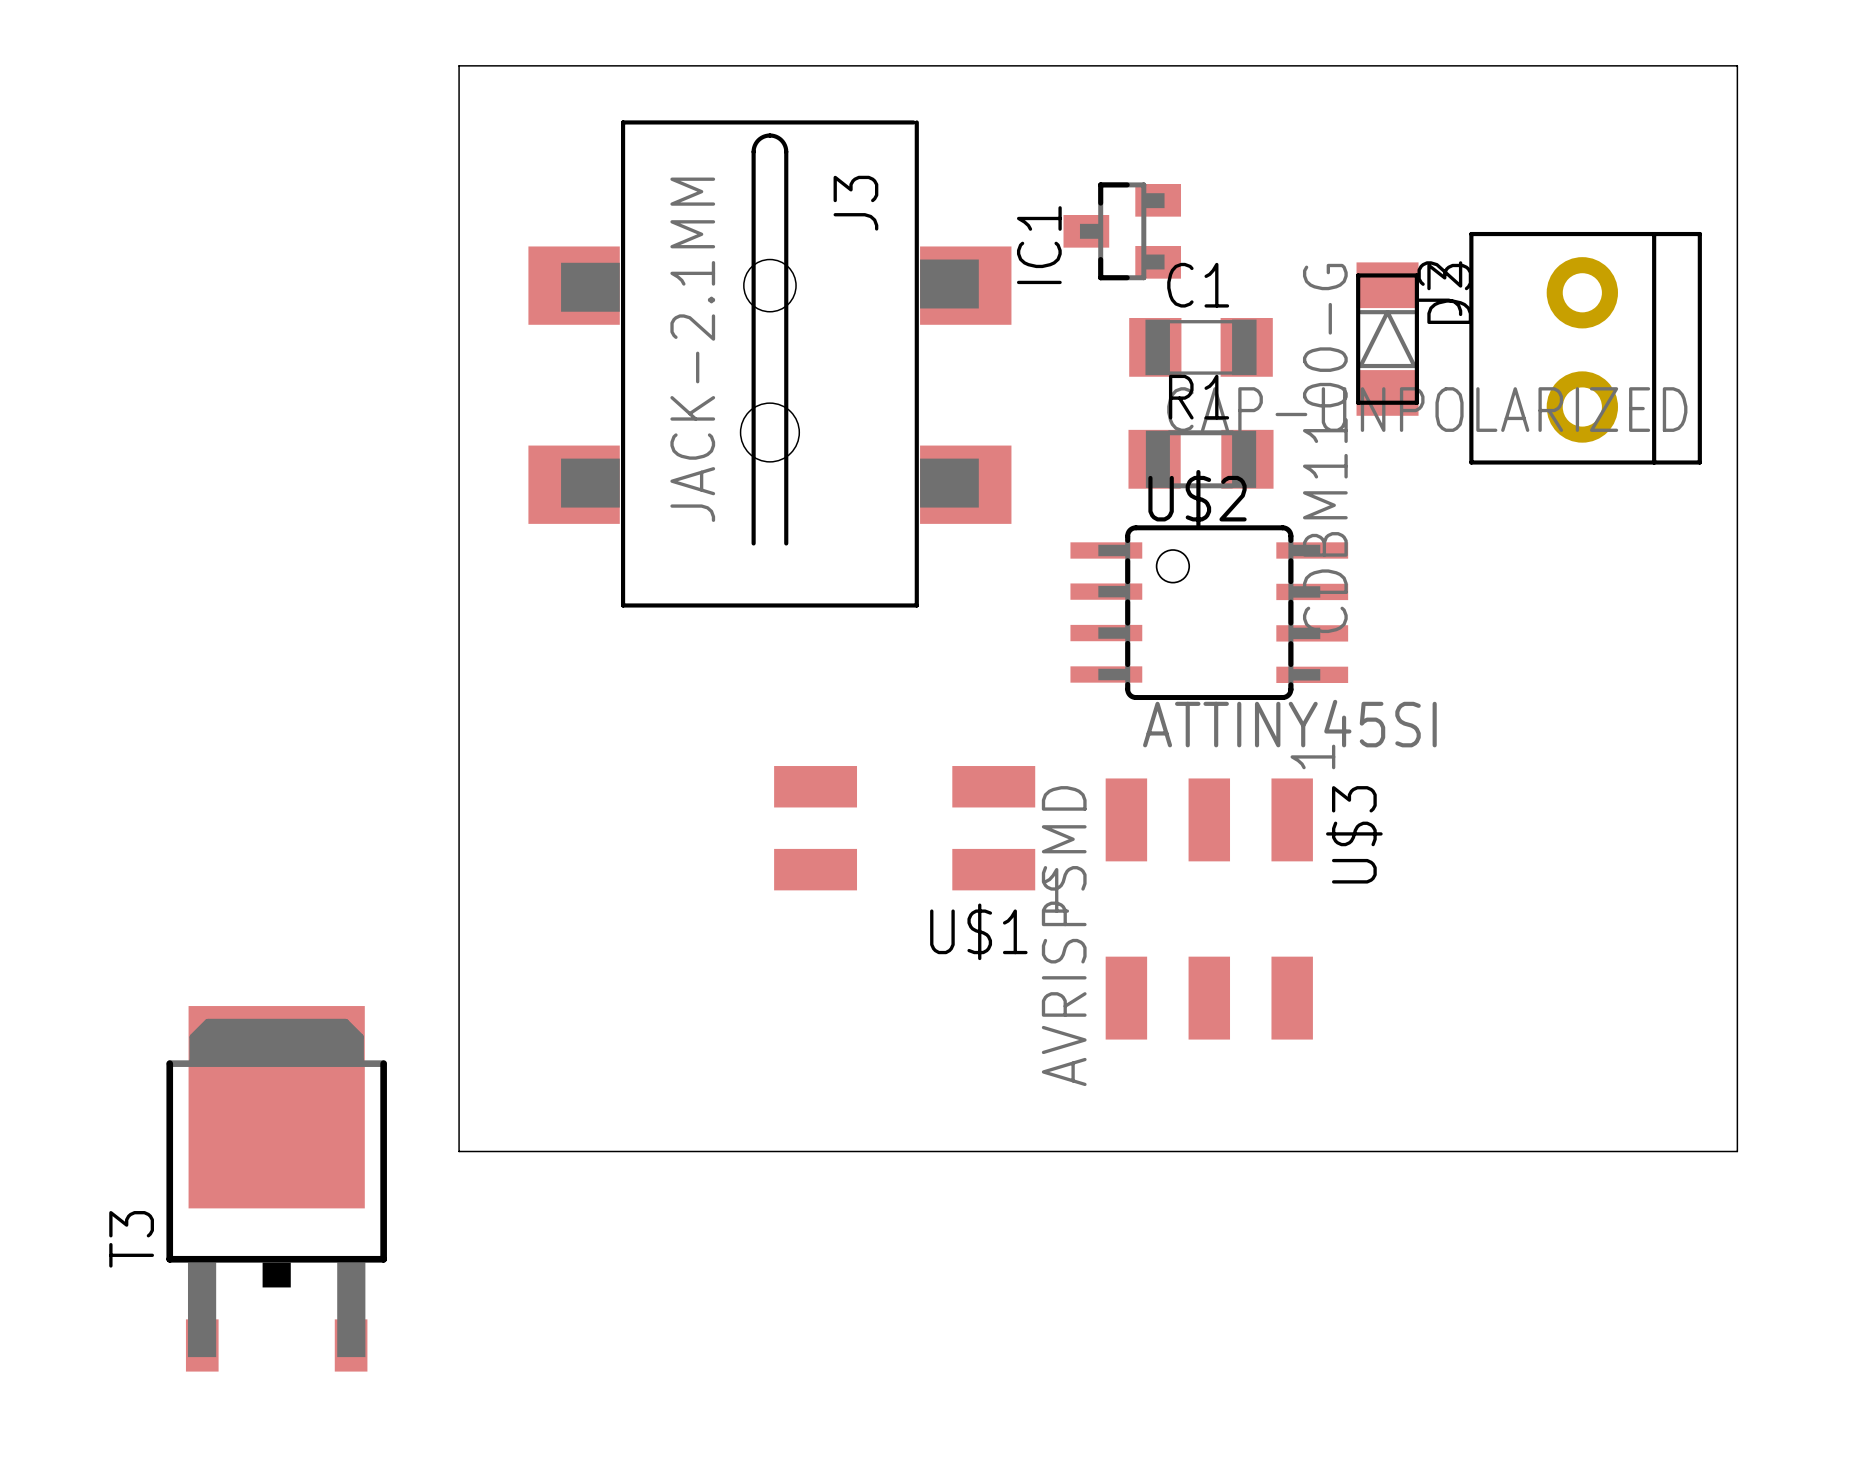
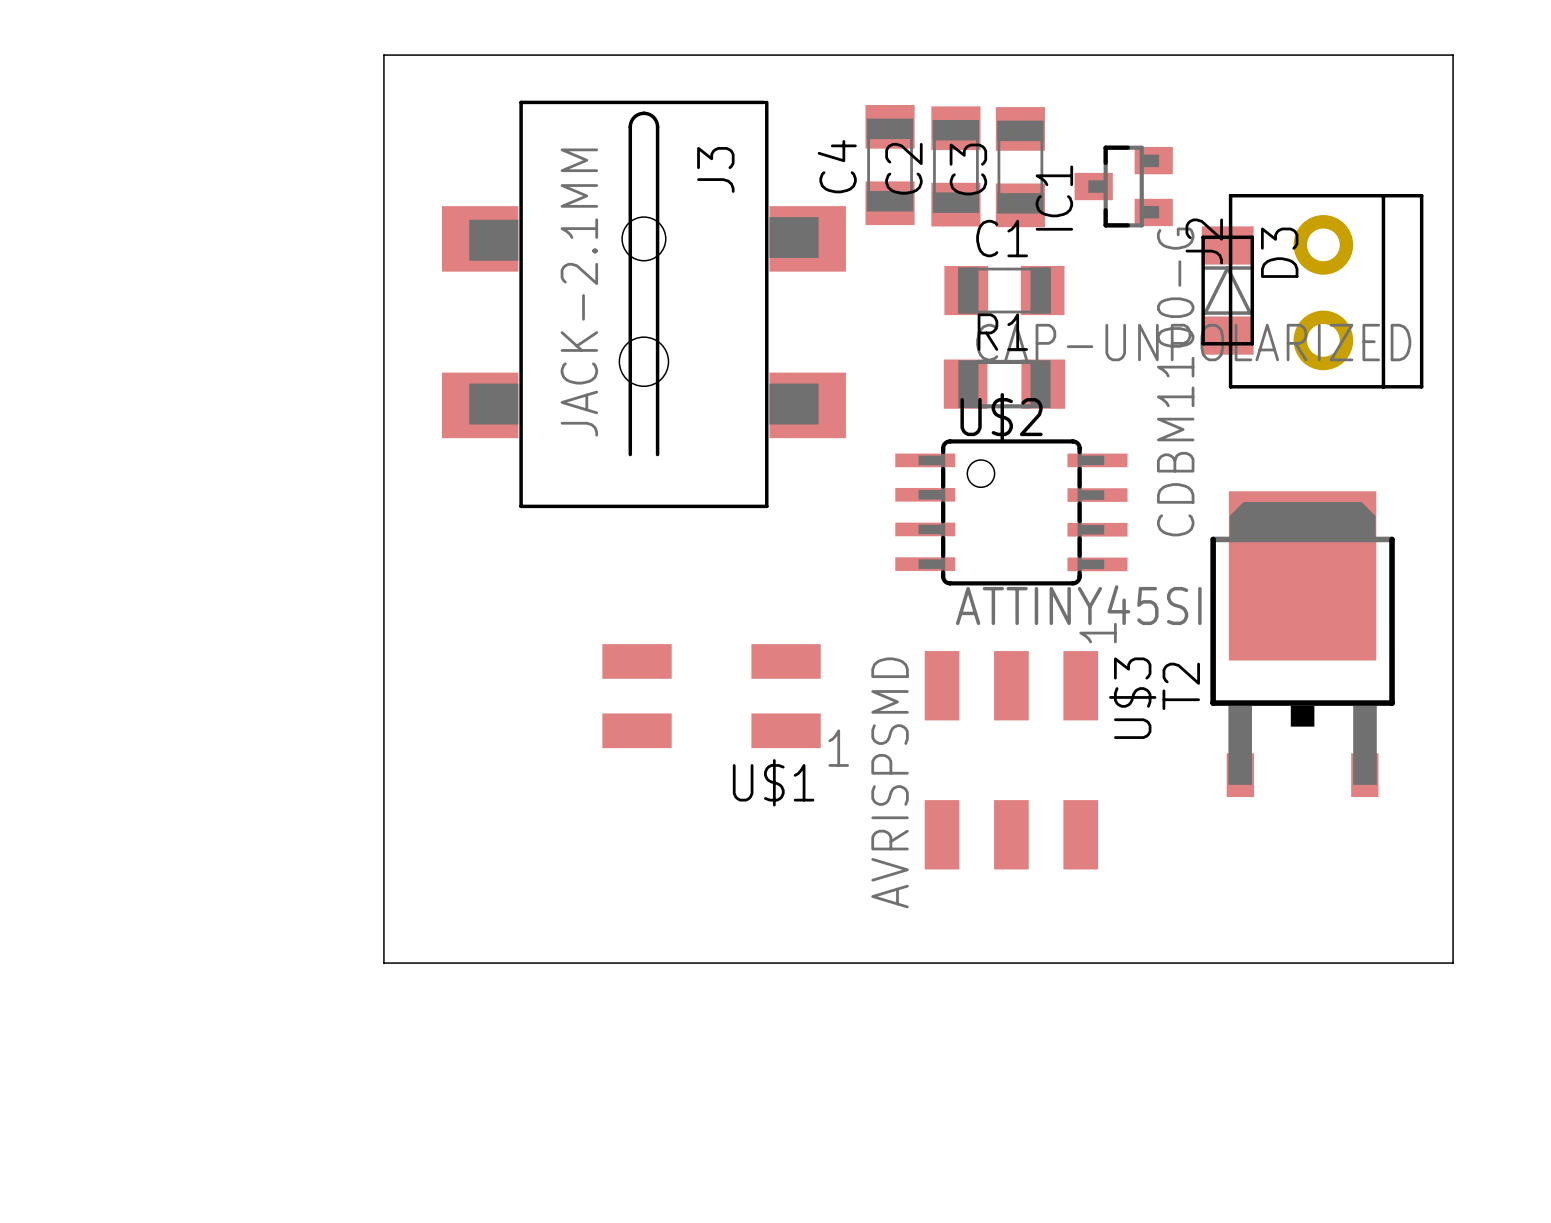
C4: none -> (890, 165)
C2: none -> (955, 166)
C3: none -> (1020, 167)
IC1 position: (1122, 231) -> (1123, 186)
D3 position: (1387, 339) -> (1227, 290)
T2: none -> (1302, 644)
U$1 position: (904, 828) -> (711, 696)
T3: (276, 1188) -> none

